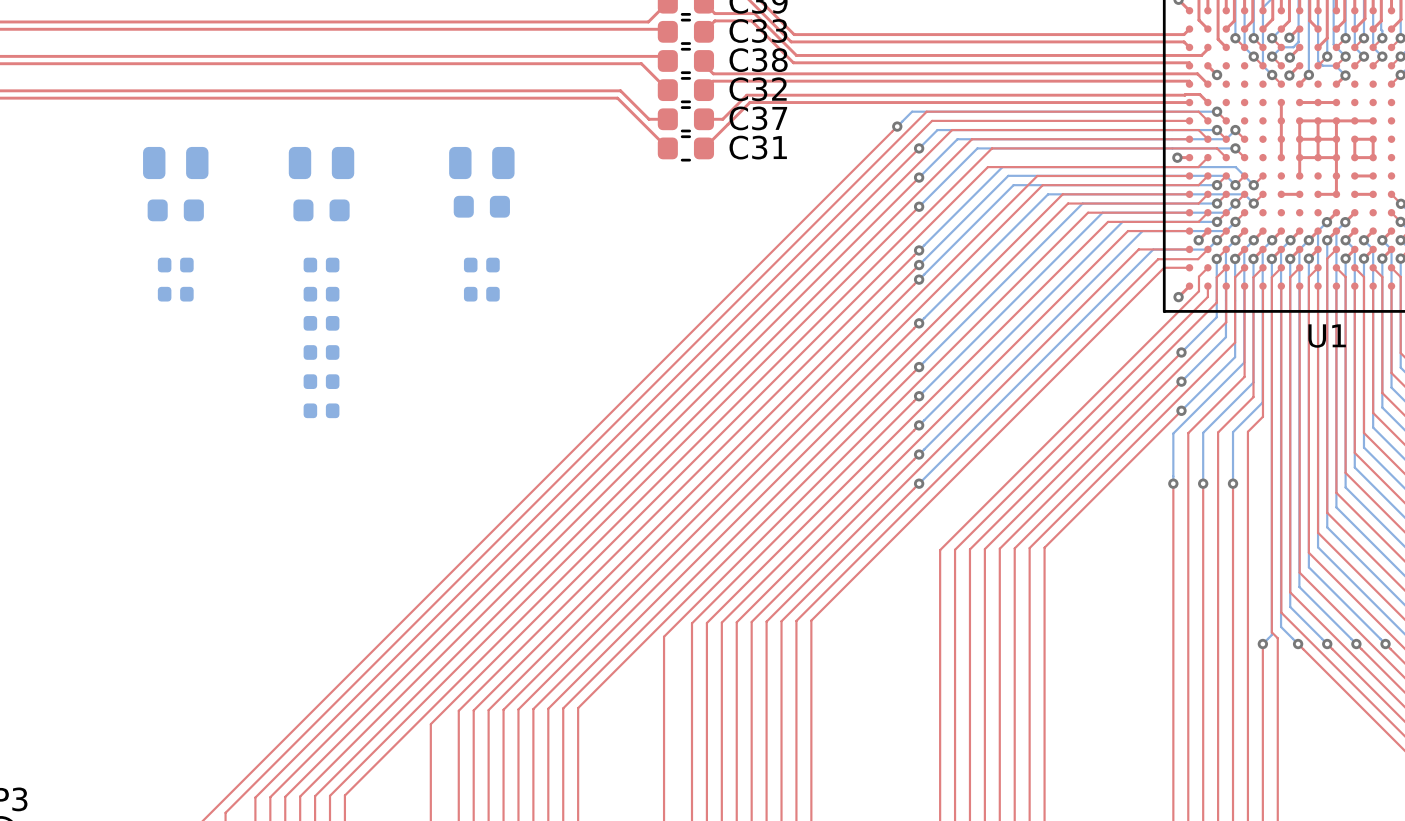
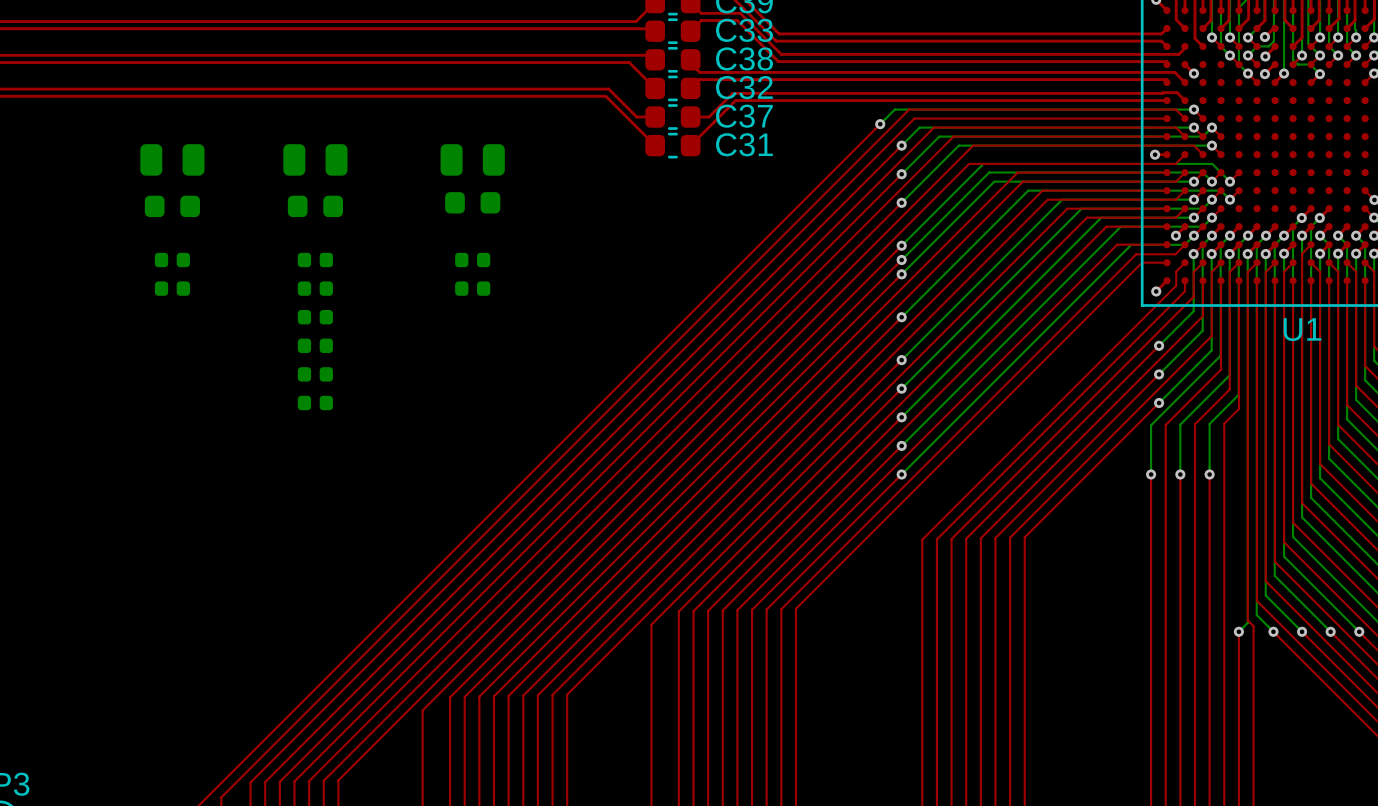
top track: (1281, 102) (1281, 157) -> none
top track: (1299, 102) (1336, 102) -> none
top track: (1336, 120) (1336, 194) (1318, 194) -> none
top track: (1373, 120) (1299, 120) (1299, 175) -> none
top track: (1318, 121) (1318, 157) -> none
top track: (1299, 139) (1336, 139) -> none
top track: (1354, 139) (1373, 139) (1373, 157) (1354, 157) (1354, 139) -> none
top track: (1299, 157) (1336, 157) -> none
top track: (1354, 175) (1373, 175) -> none
top track: (1281, 194) (1299, 194) -> none
top track: (1354, 194) (1373, 194) -> none

